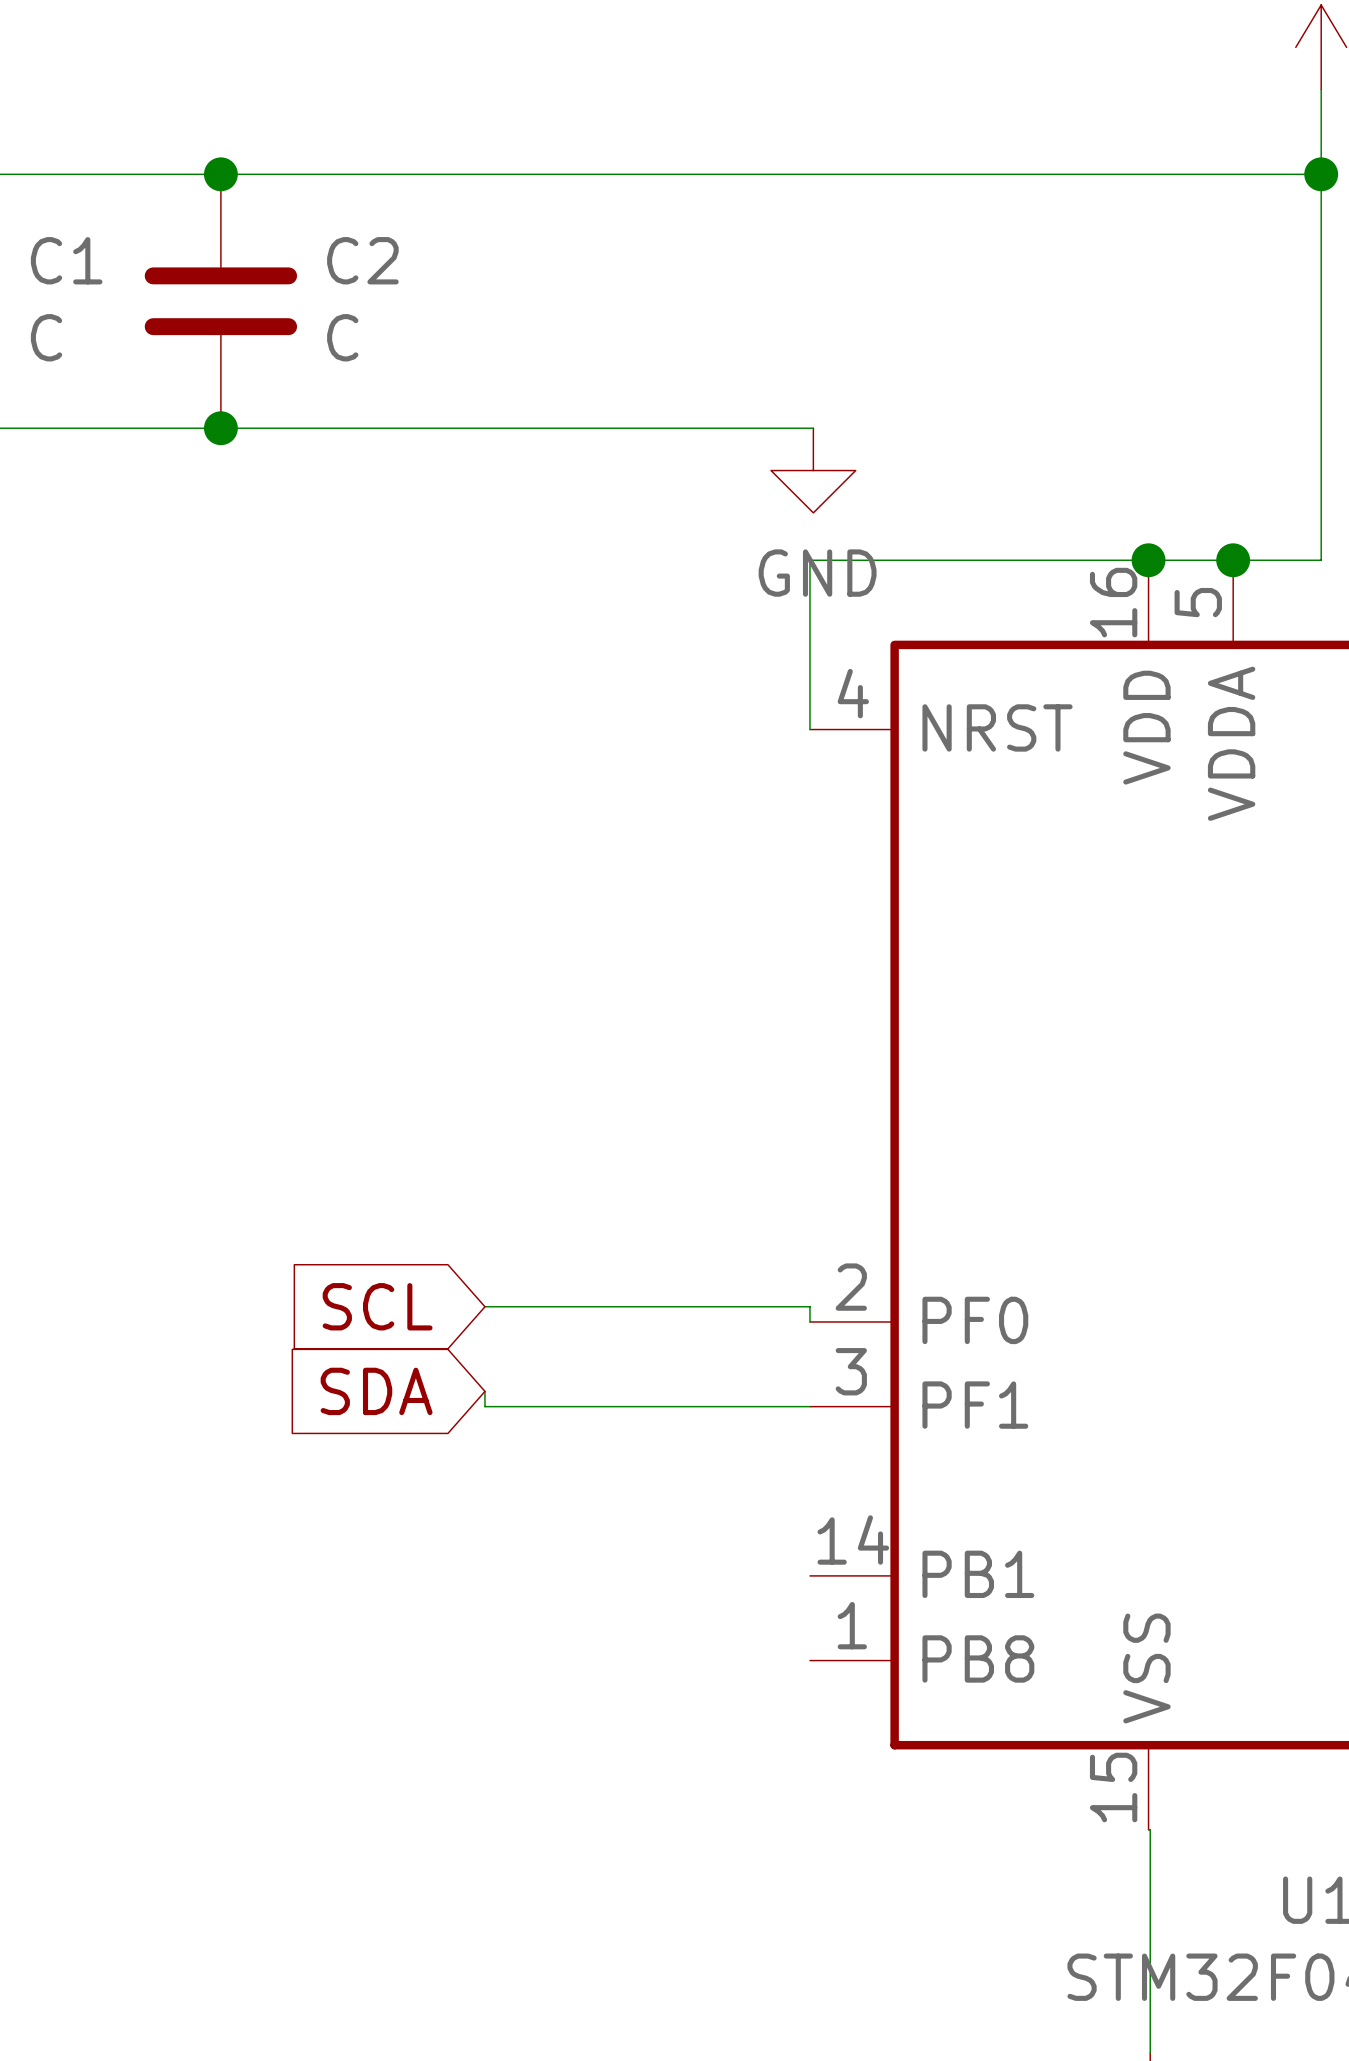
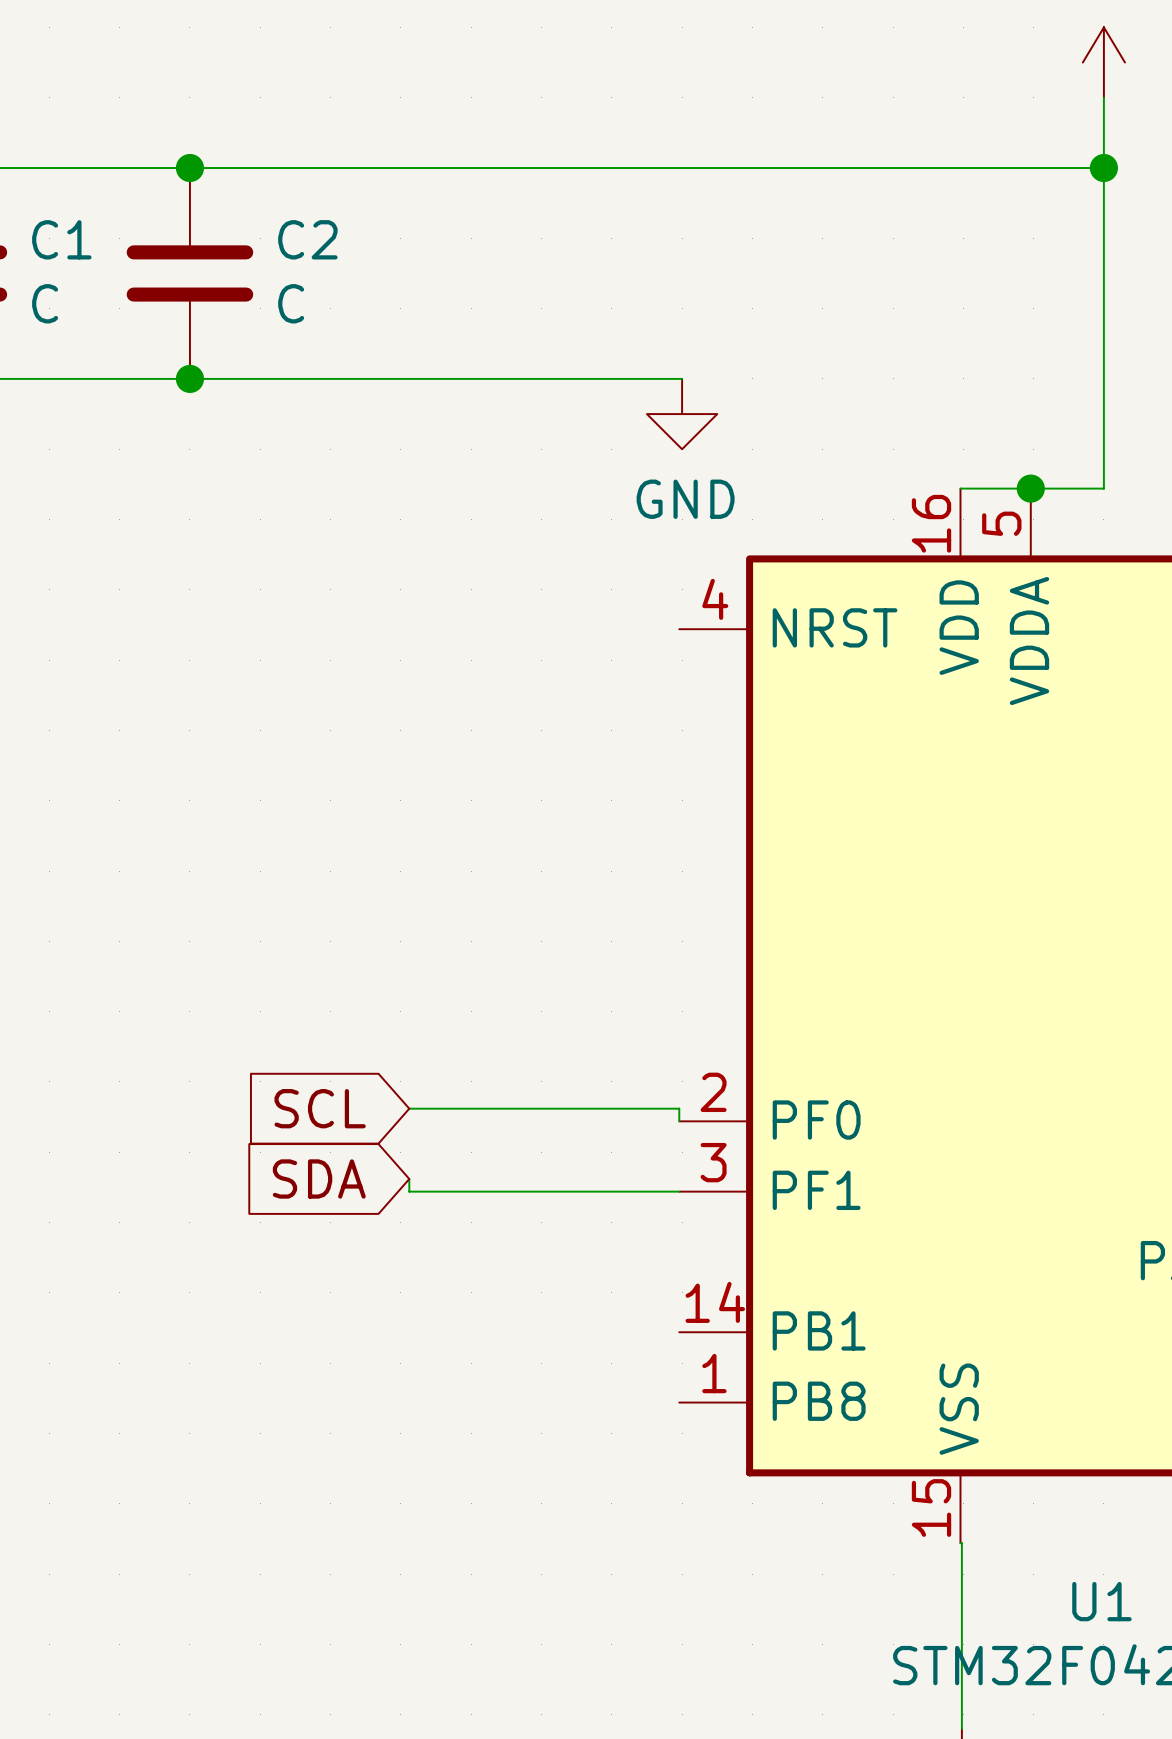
wire: (1148, 560) (809, 560) (809, 729) -> none
junction: (1148, 560) -> none

